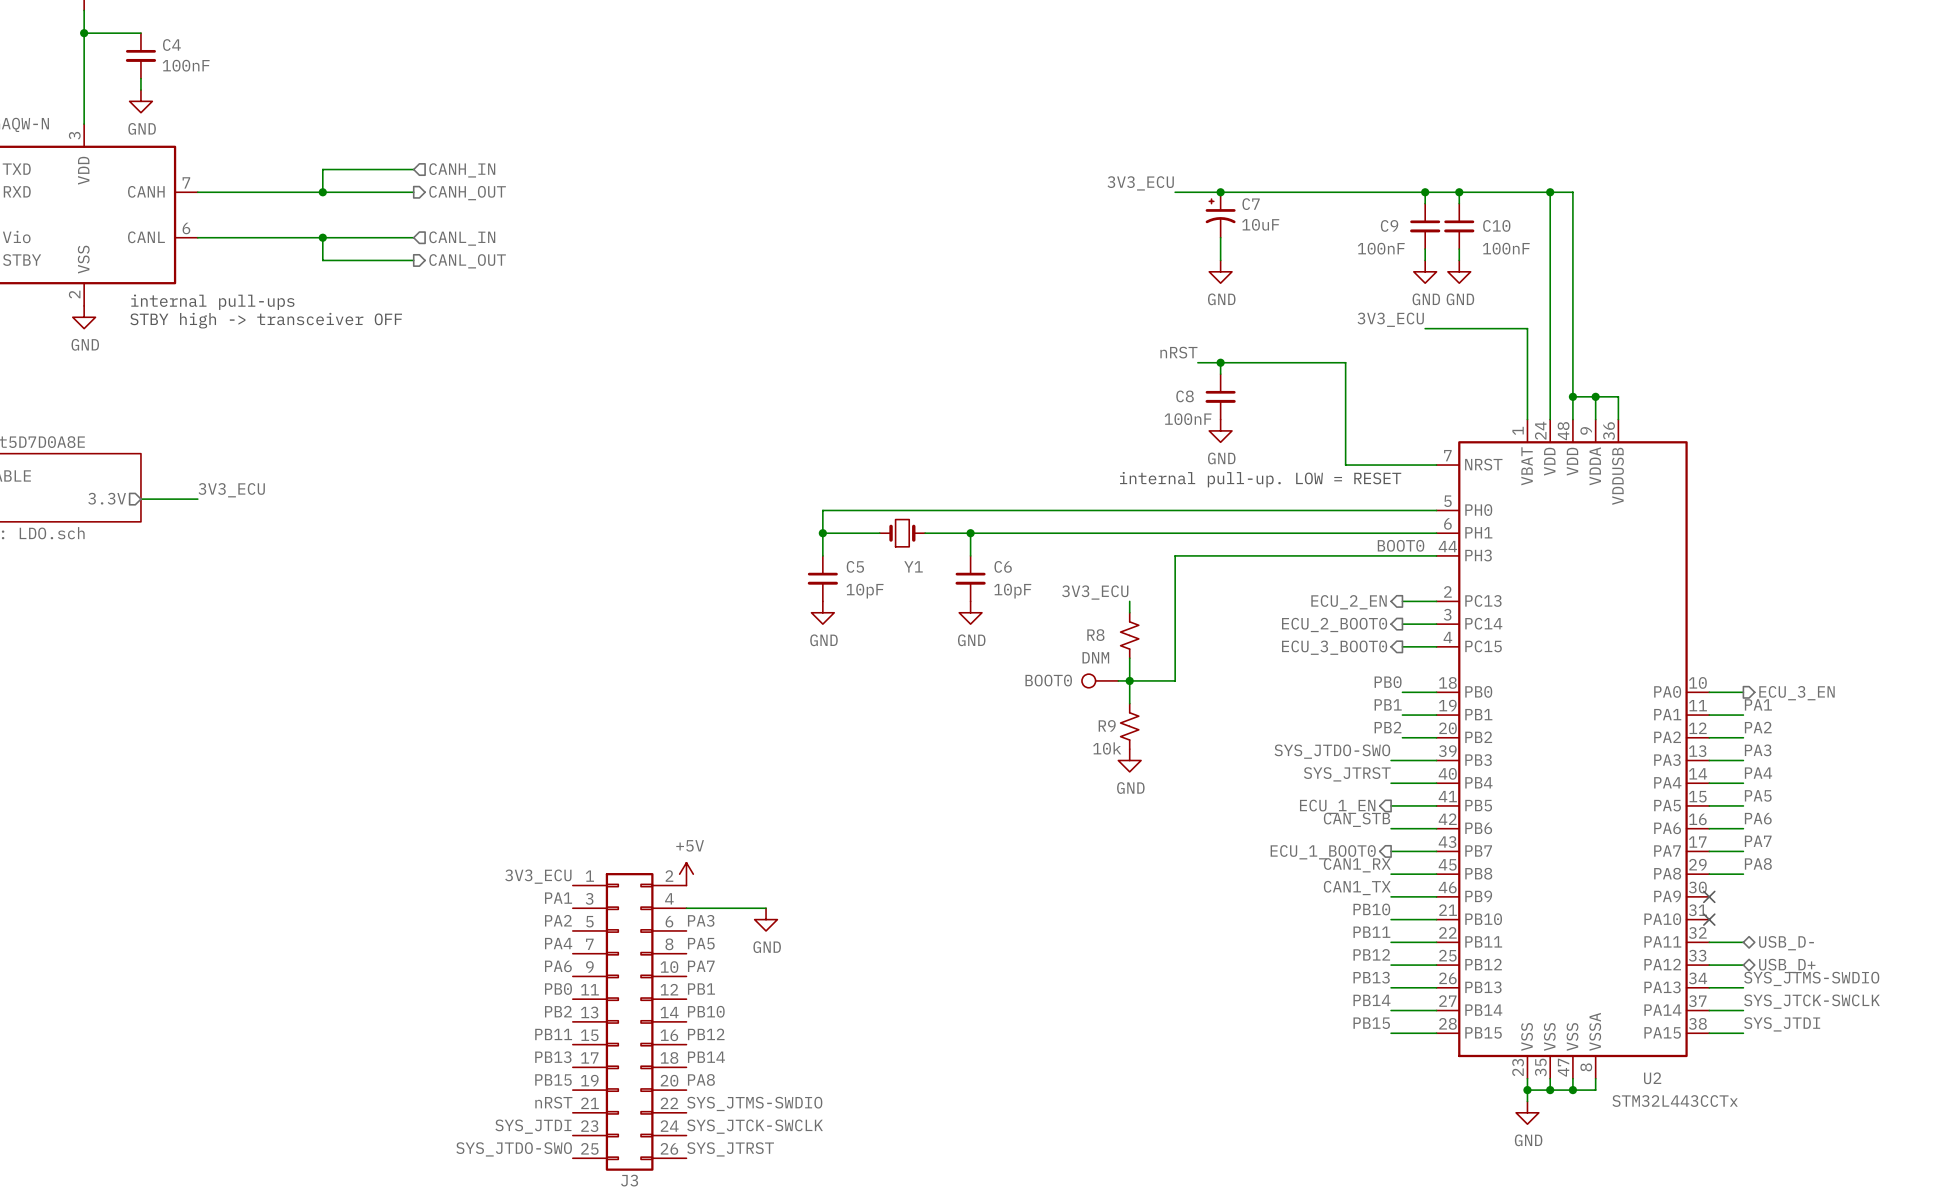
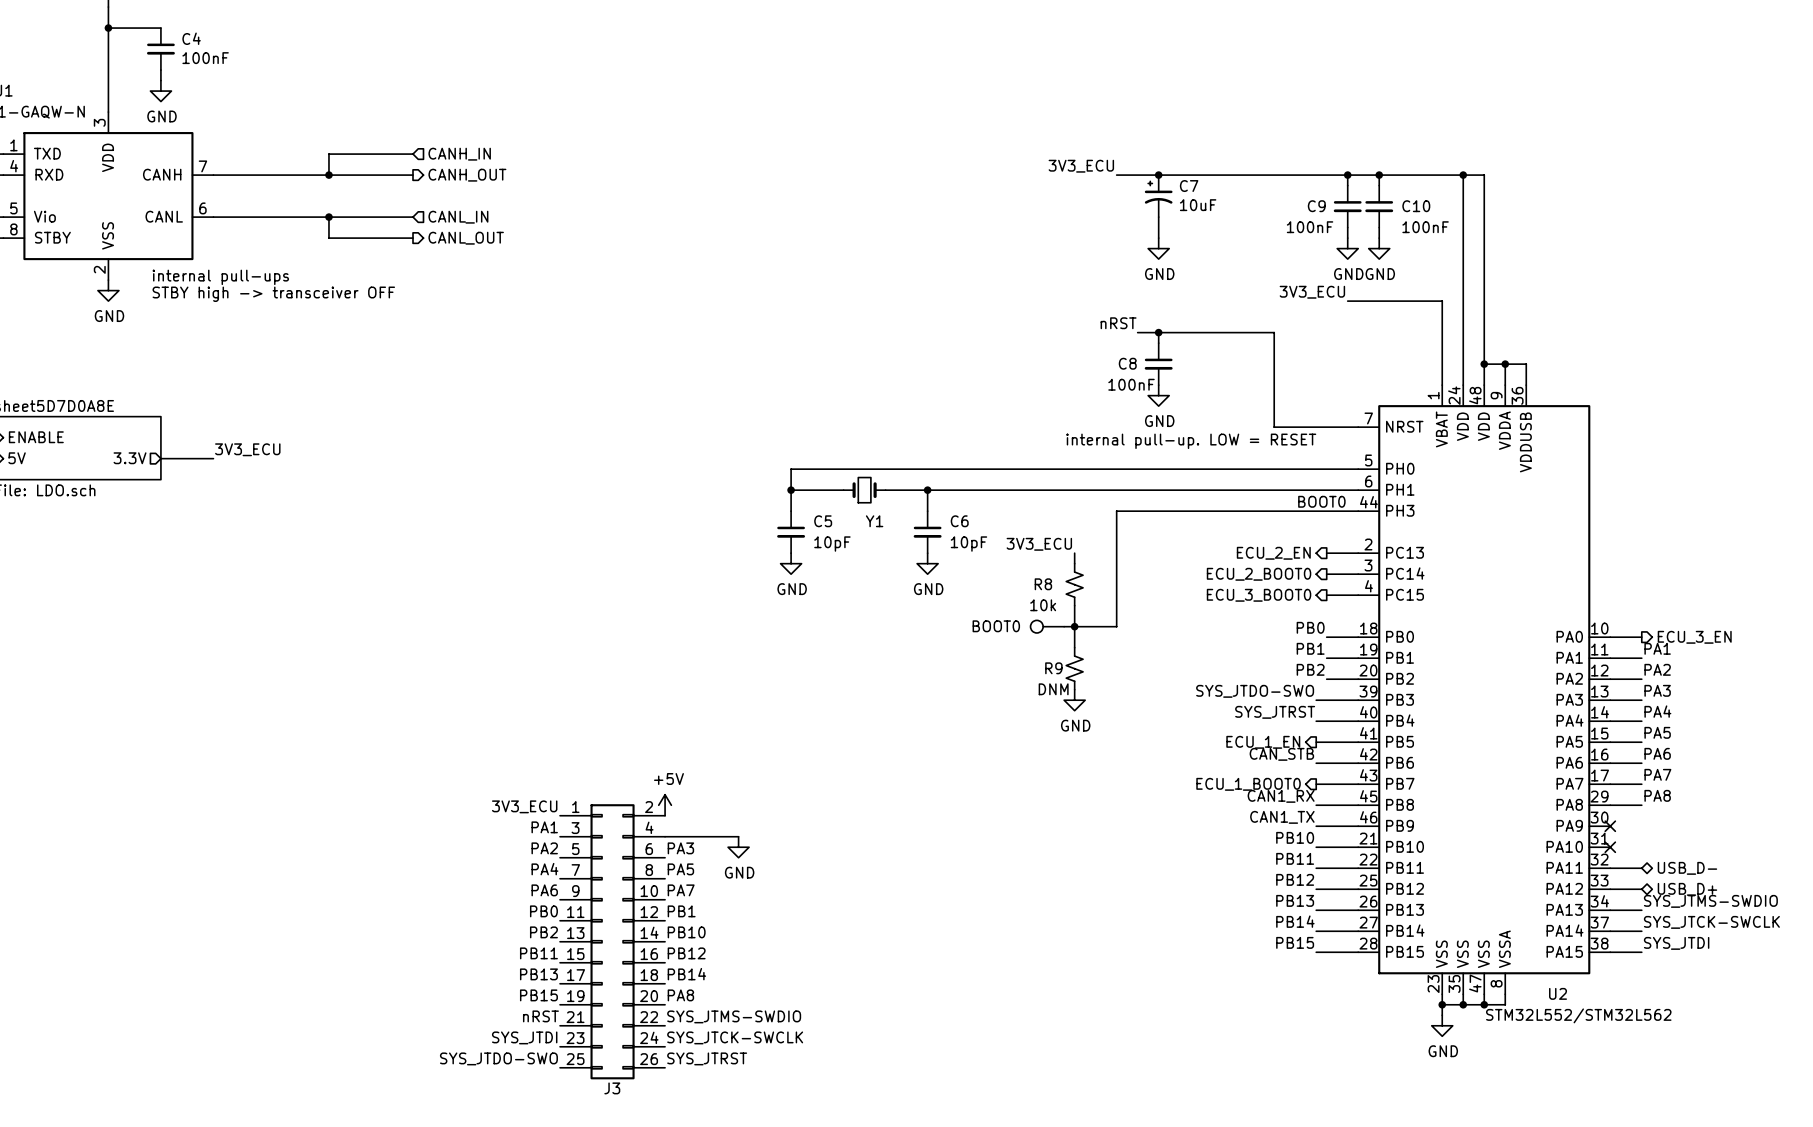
R8 value: DNM (1095, 657) -> 10k (1043, 605)
R9 value: 10k (1107, 748) -> DNM (1053, 689)
U2 value: STM32L443CCTx (1675, 1101) -> STM32L552/STM32L562 (1578, 1015)

